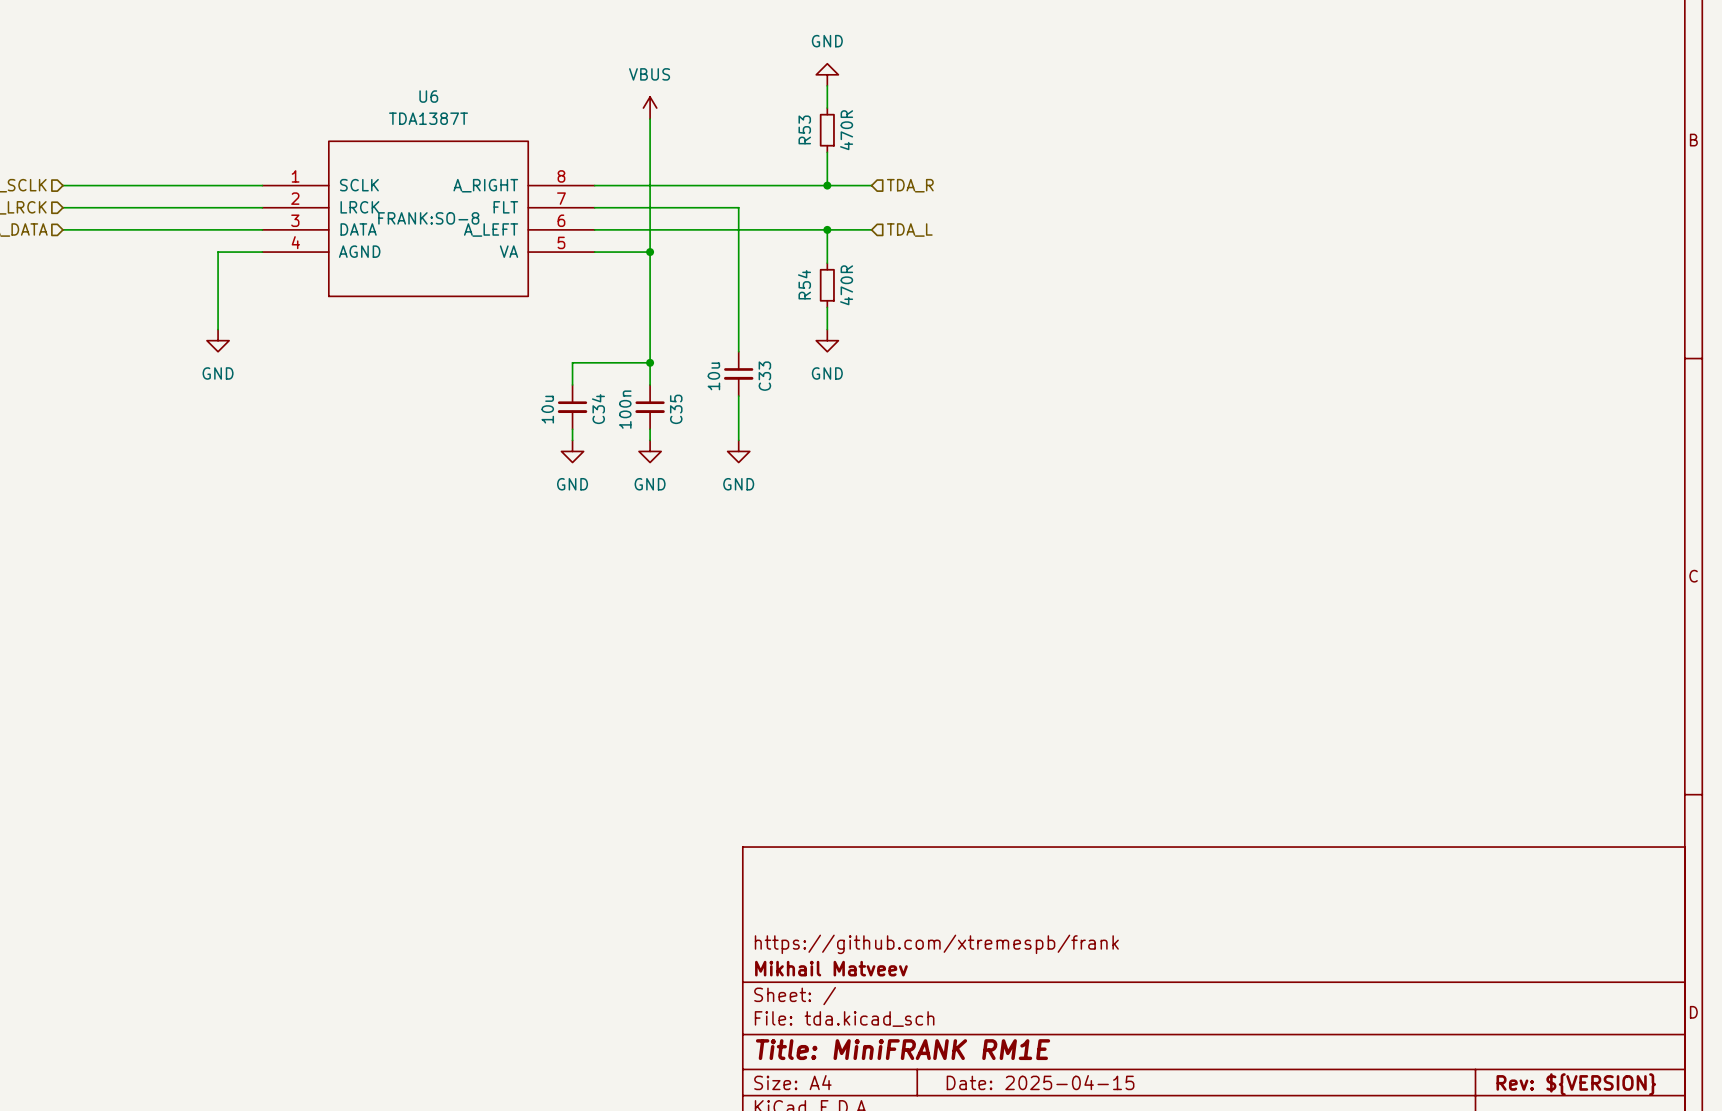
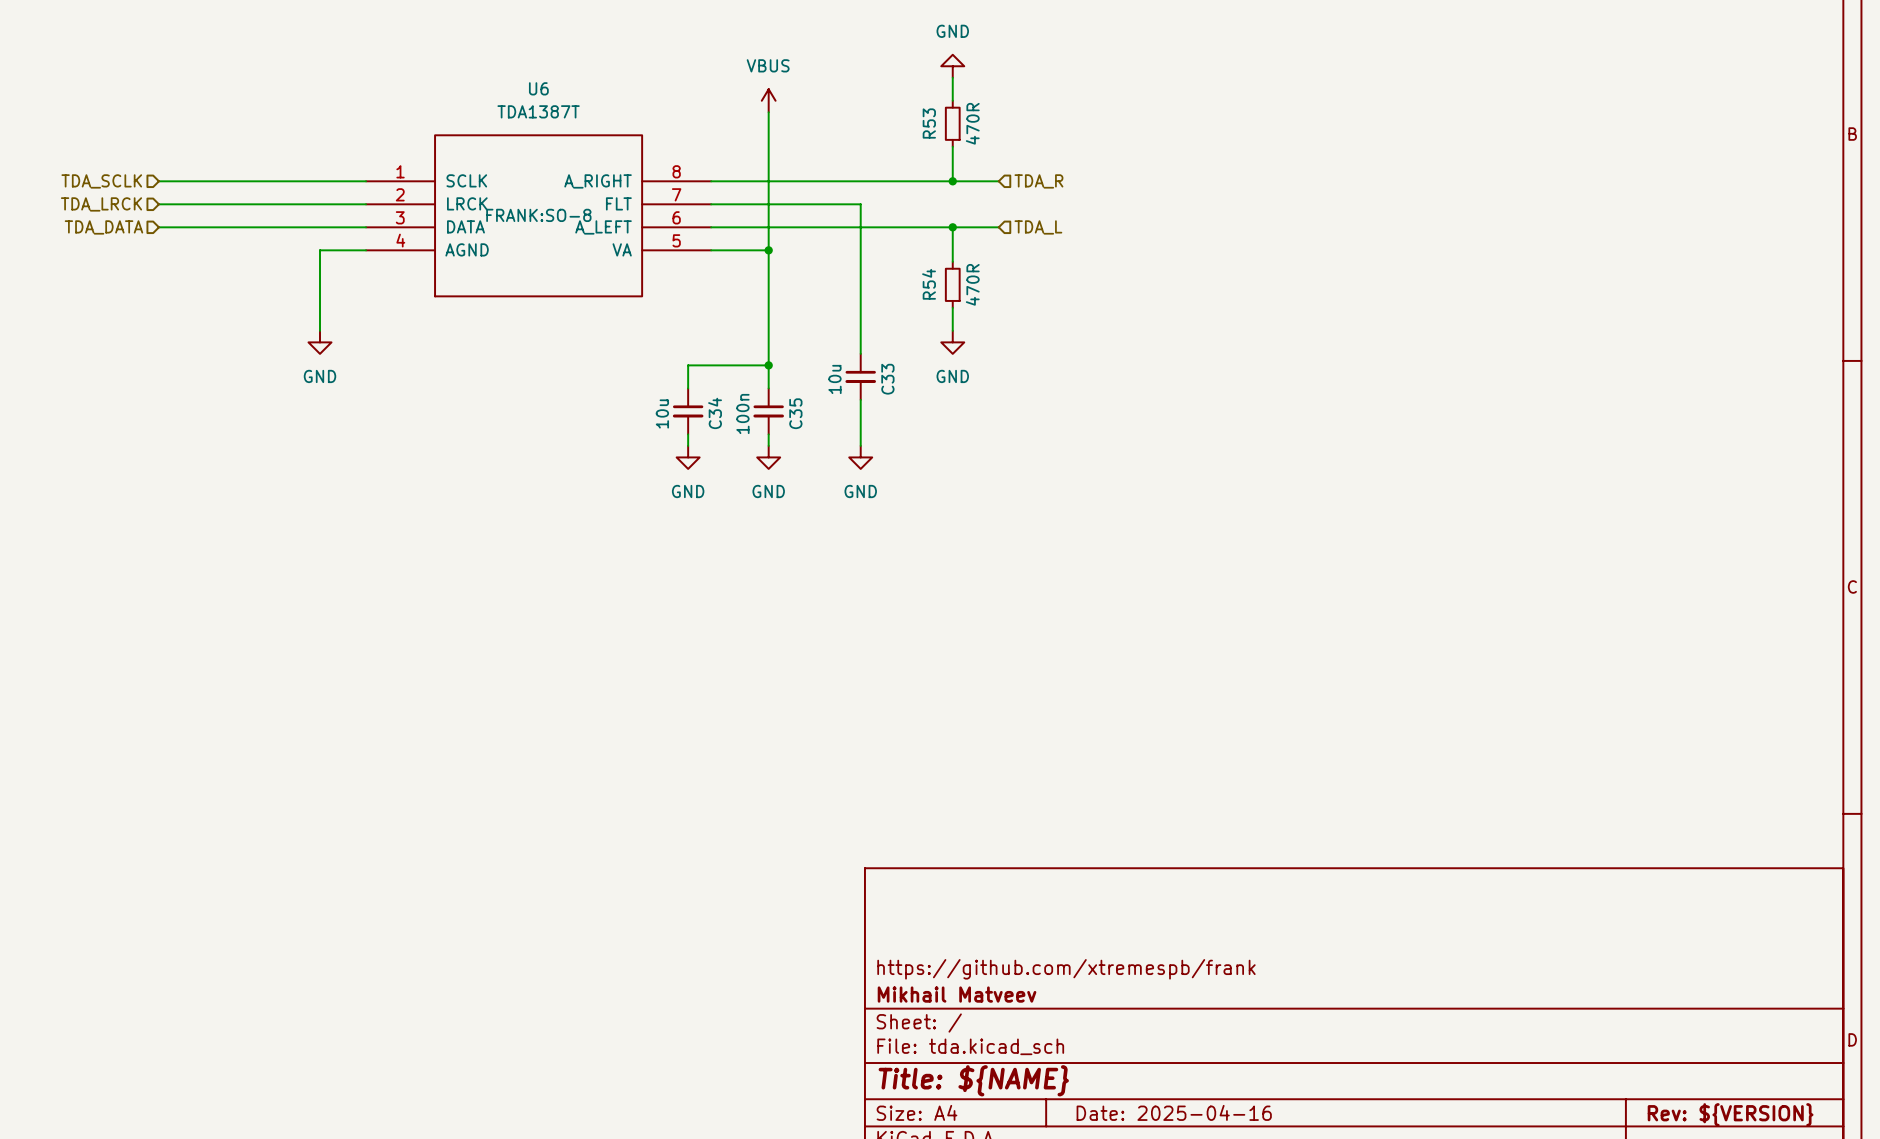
title block: Title: MiniFRANK RM1E (903, 1049) -> Title: ${NAME} (973, 1080)
title block: Date: 2025-04-15 (1040, 1082) -> Date: 2025-04-16 (1174, 1112)

